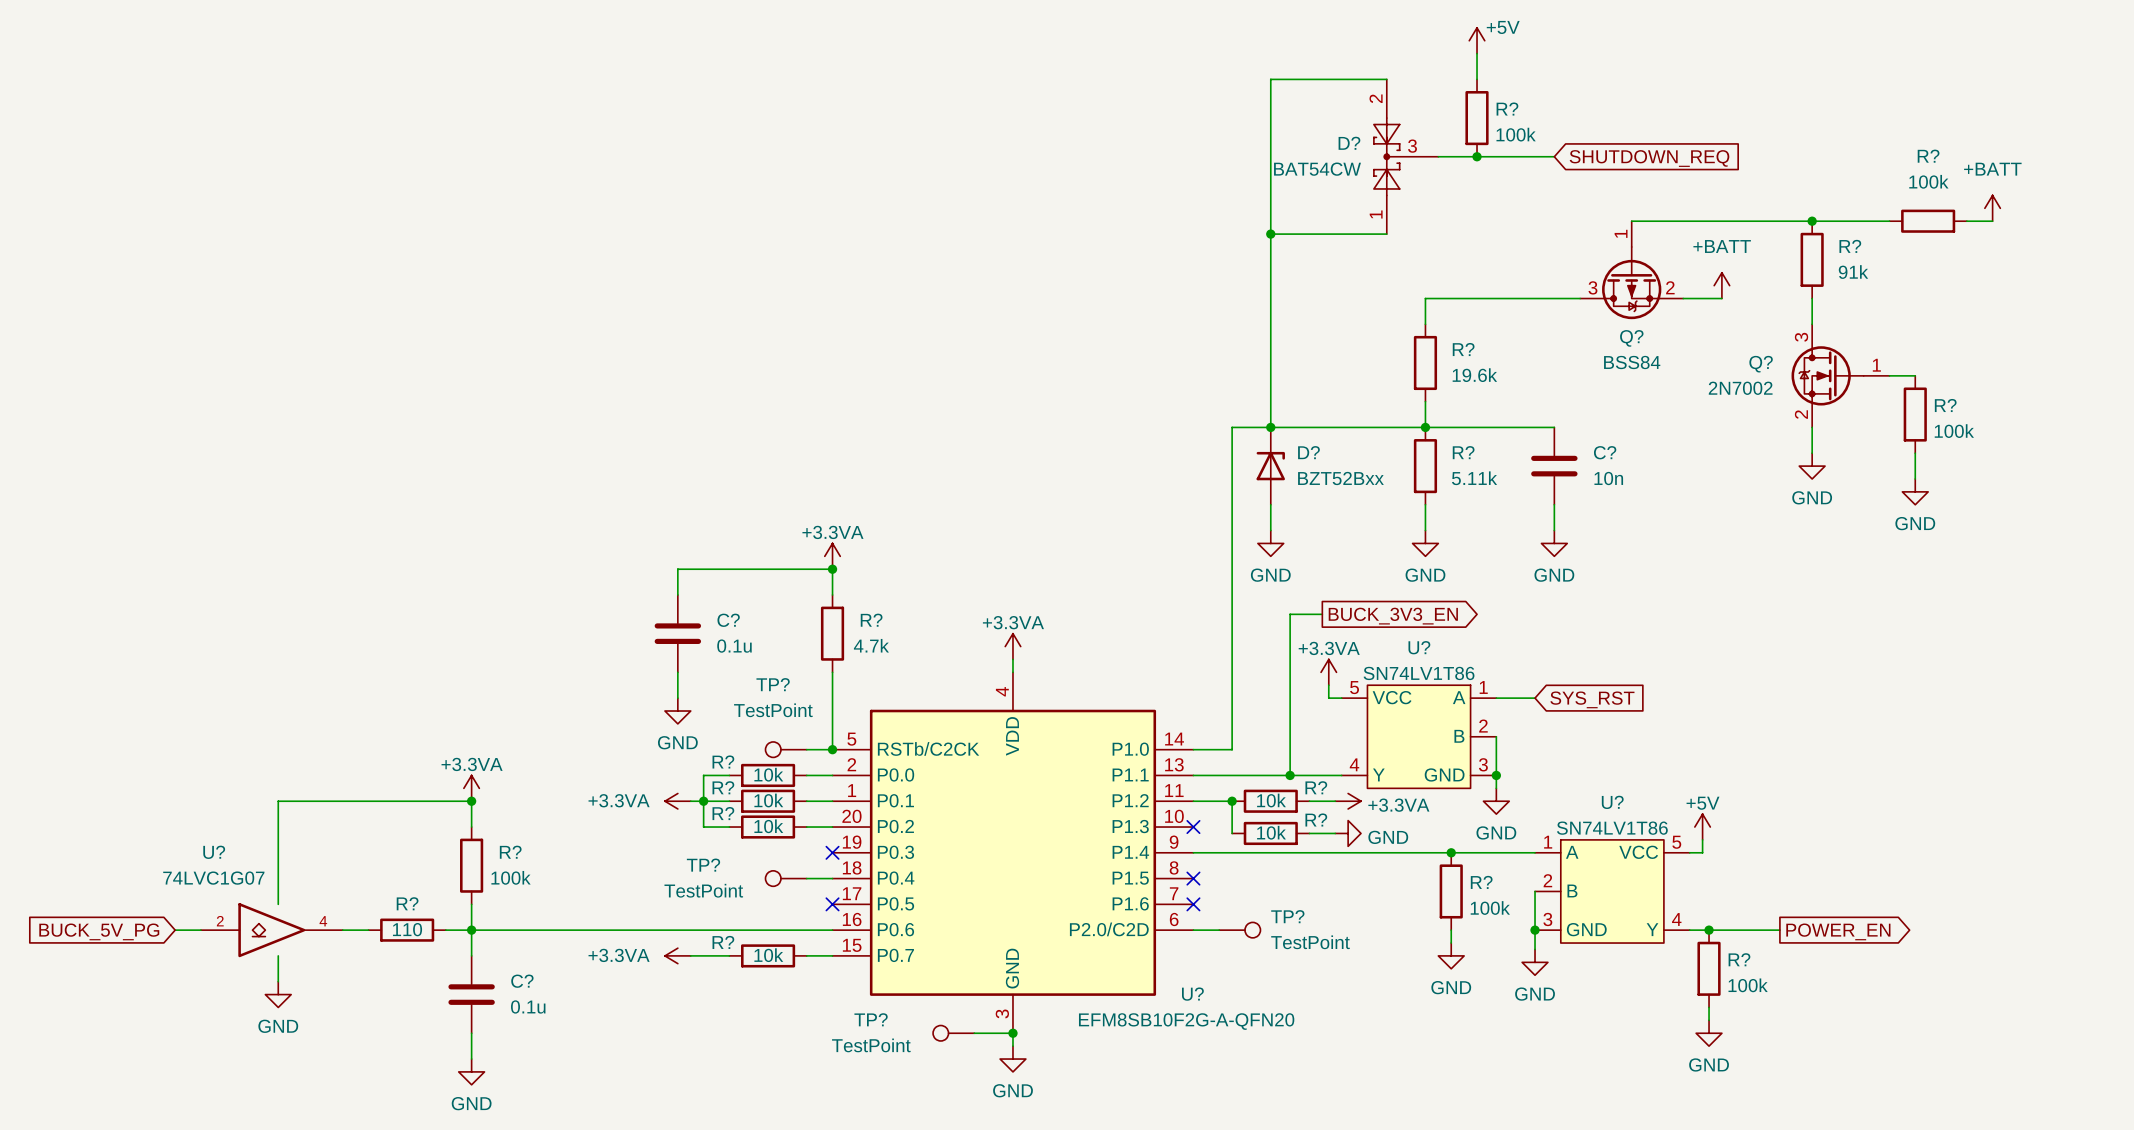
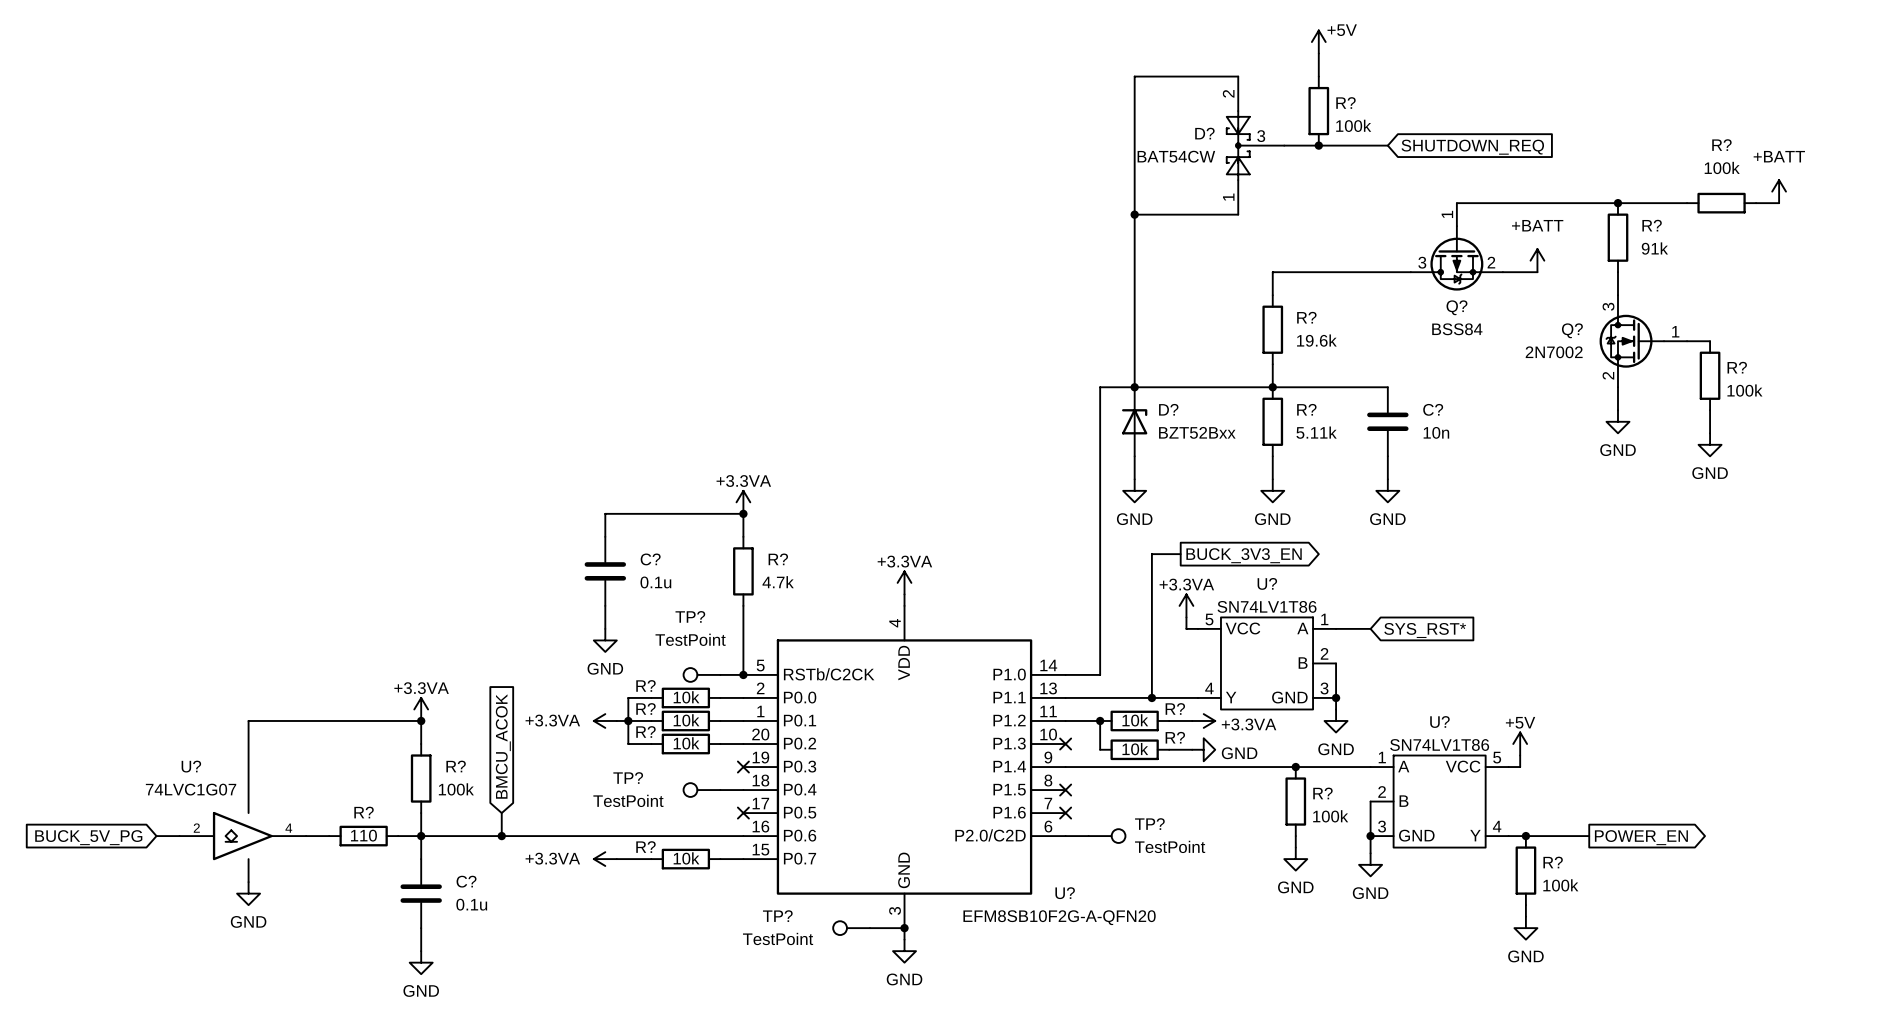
global label: SYS_RST (1592, 699) -> SYS_RST* (1425, 630)
global label: none -> BMCU_ACOK (503, 746)
wire: none -> (501, 813) (501, 836)
junction: none -> (501, 836)

